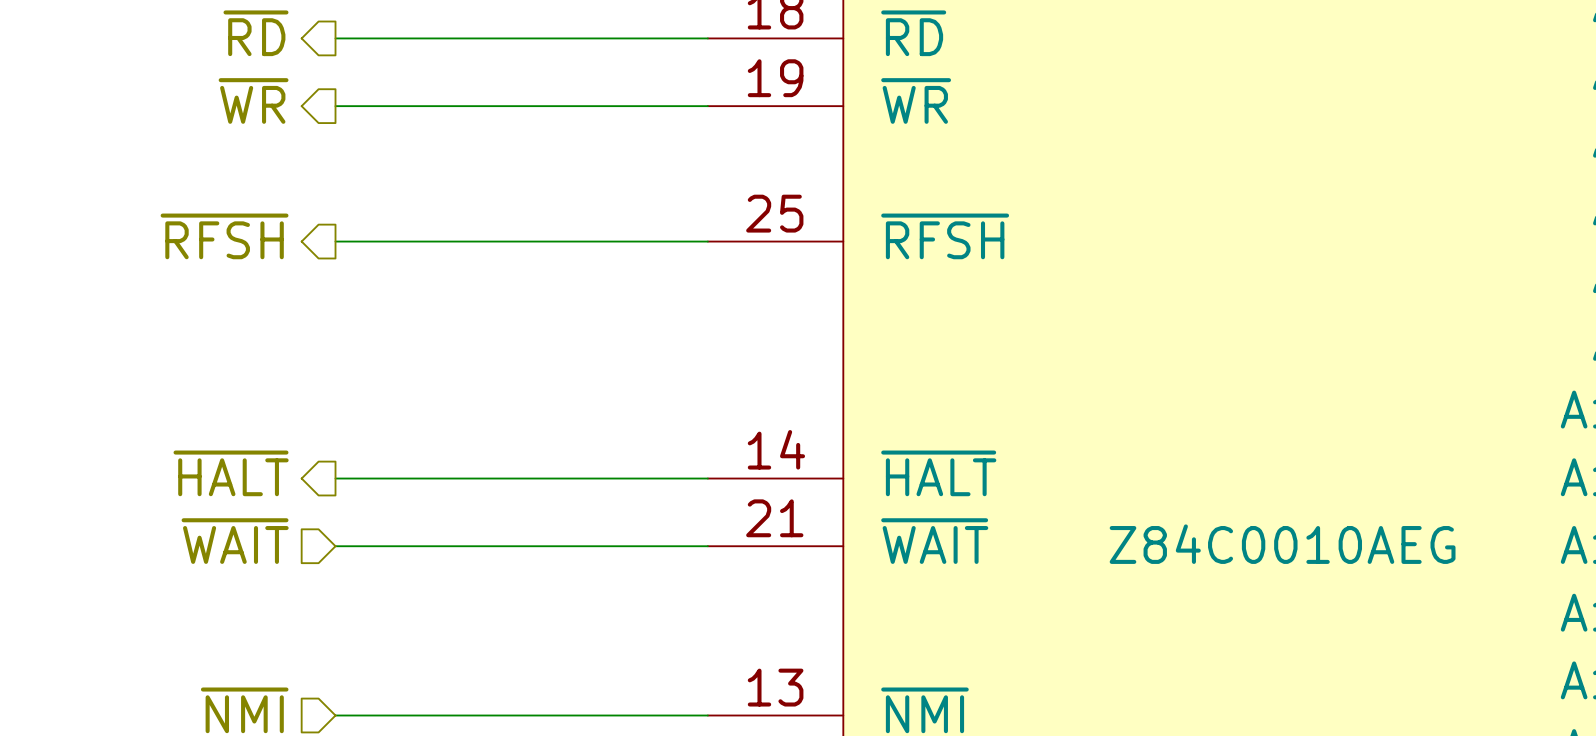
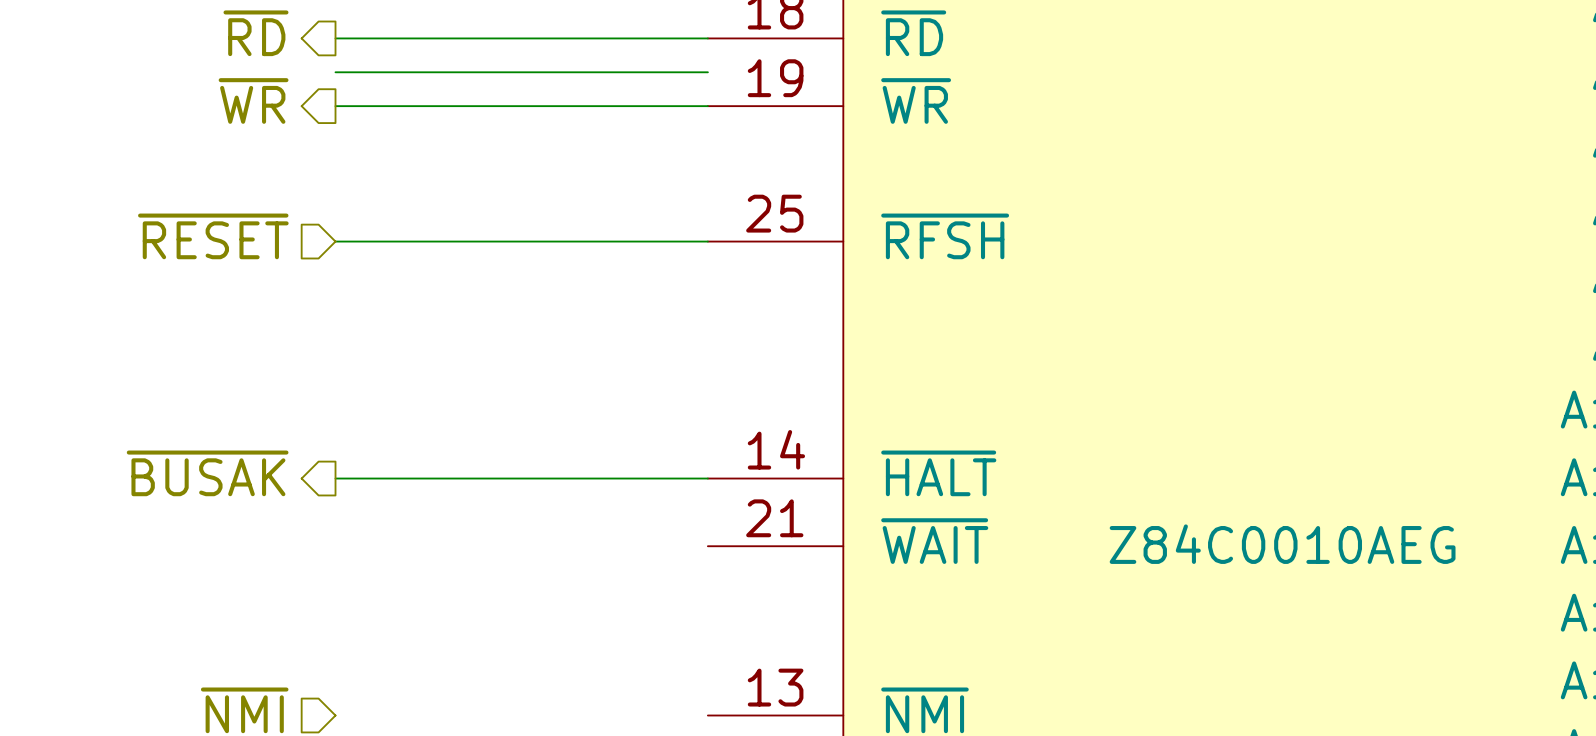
hierarchical label shape: output (224, 236) -> input (213, 236)
hierarchical label: ~{RFSH} (224, 236) -> ~{RESET} (213, 236)
hierarchical label: ~{HALT} (231, 473) -> ~{BUSAK} (207, 473)
hierarchical label: ~{WAIT} (235, 541) -> none
wire: (335, 546) (707, 546) -> none
wire: (335, 715) (707, 715) -> (335, 72) (707, 72)

